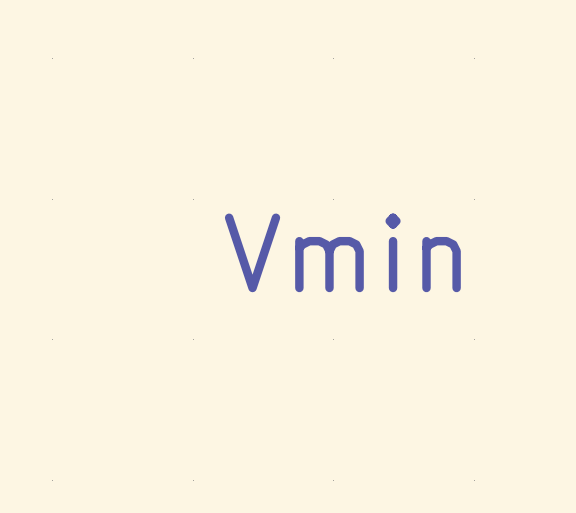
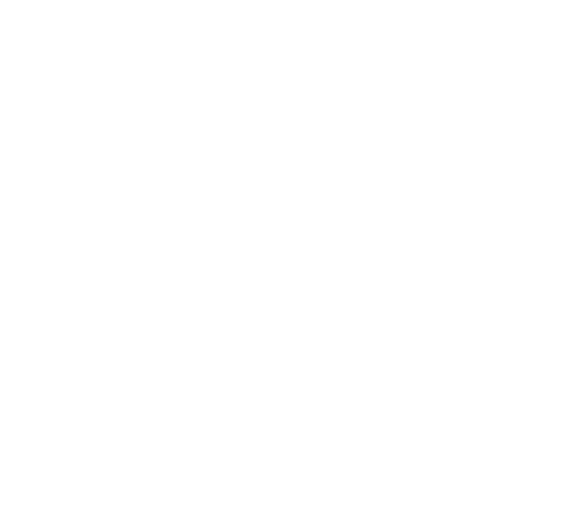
text: Vmin (342, 252) -> none

